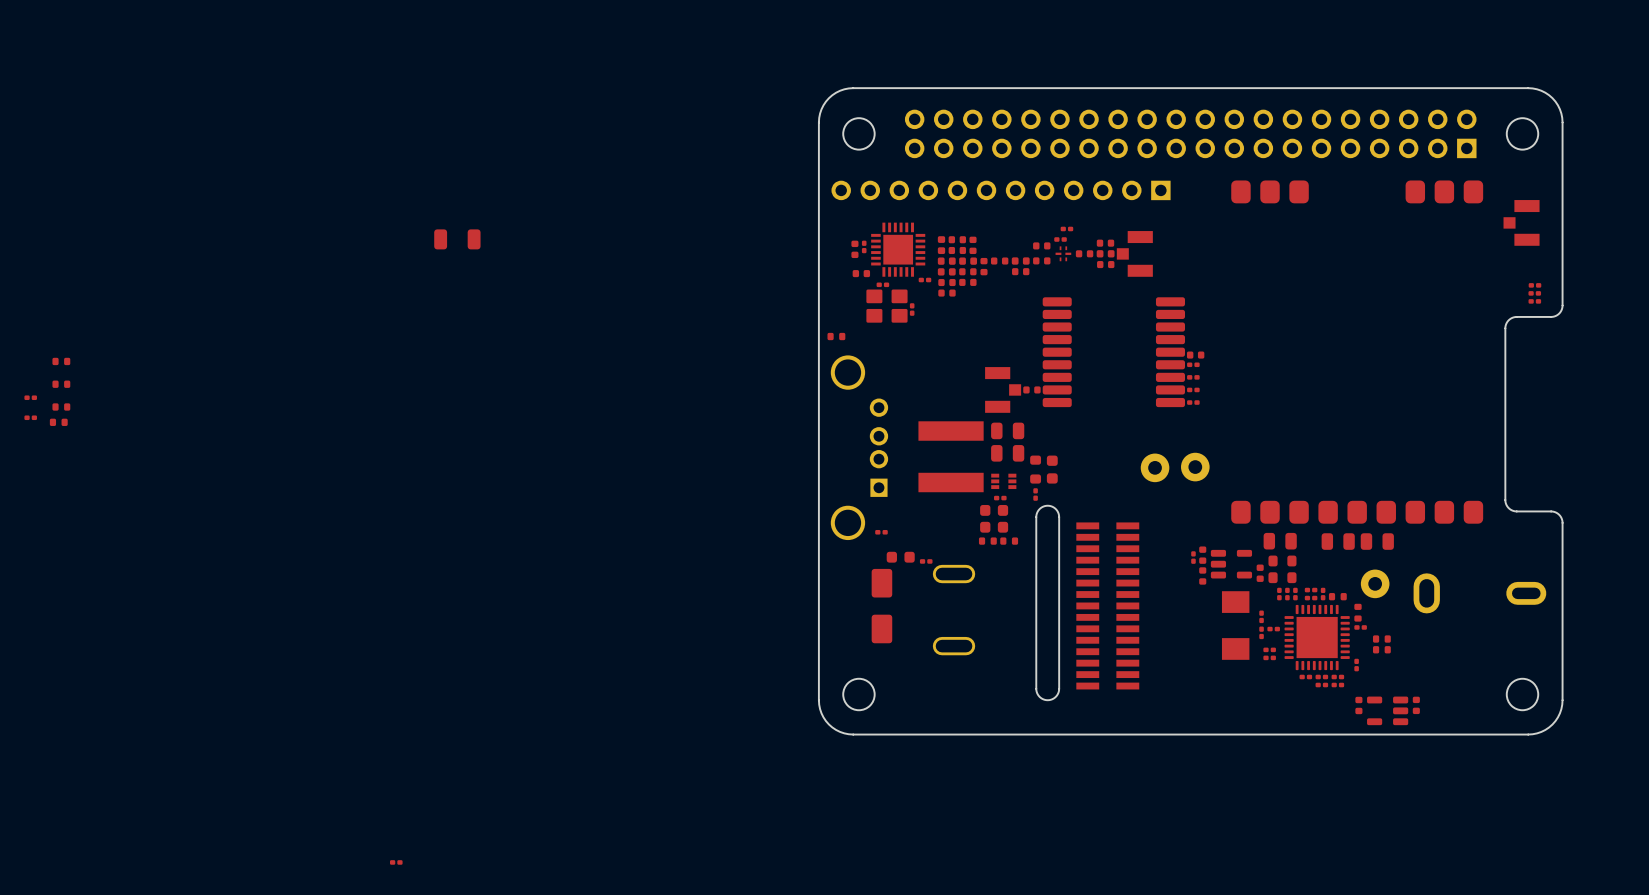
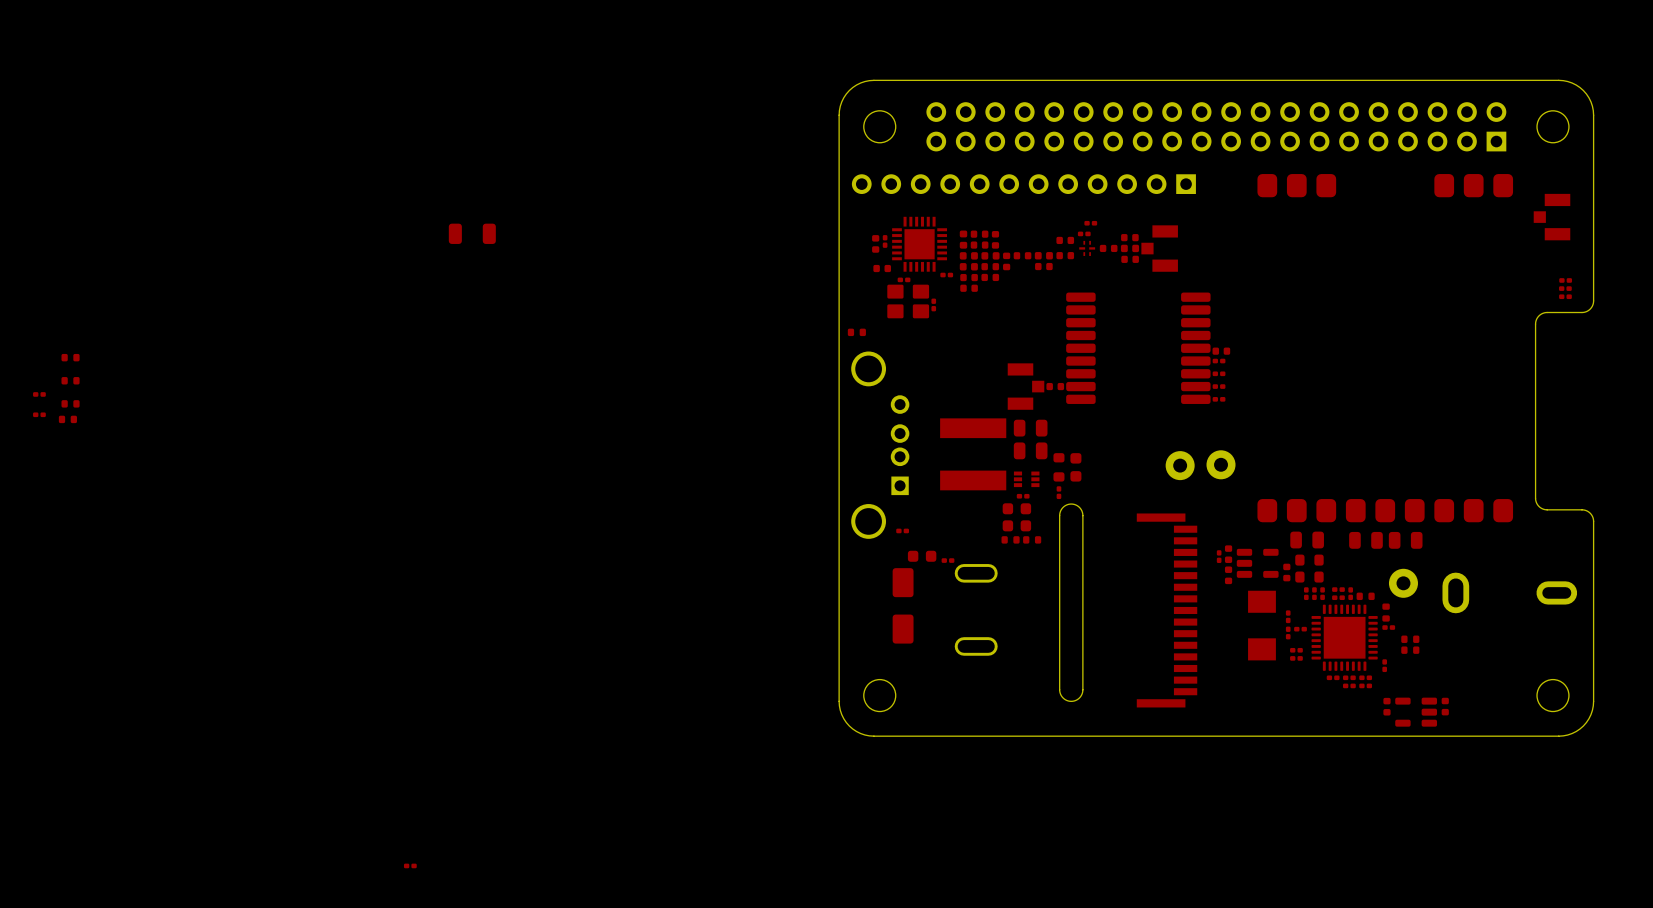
part: (1107, 605) -> none
part: none -> (1167, 610)

